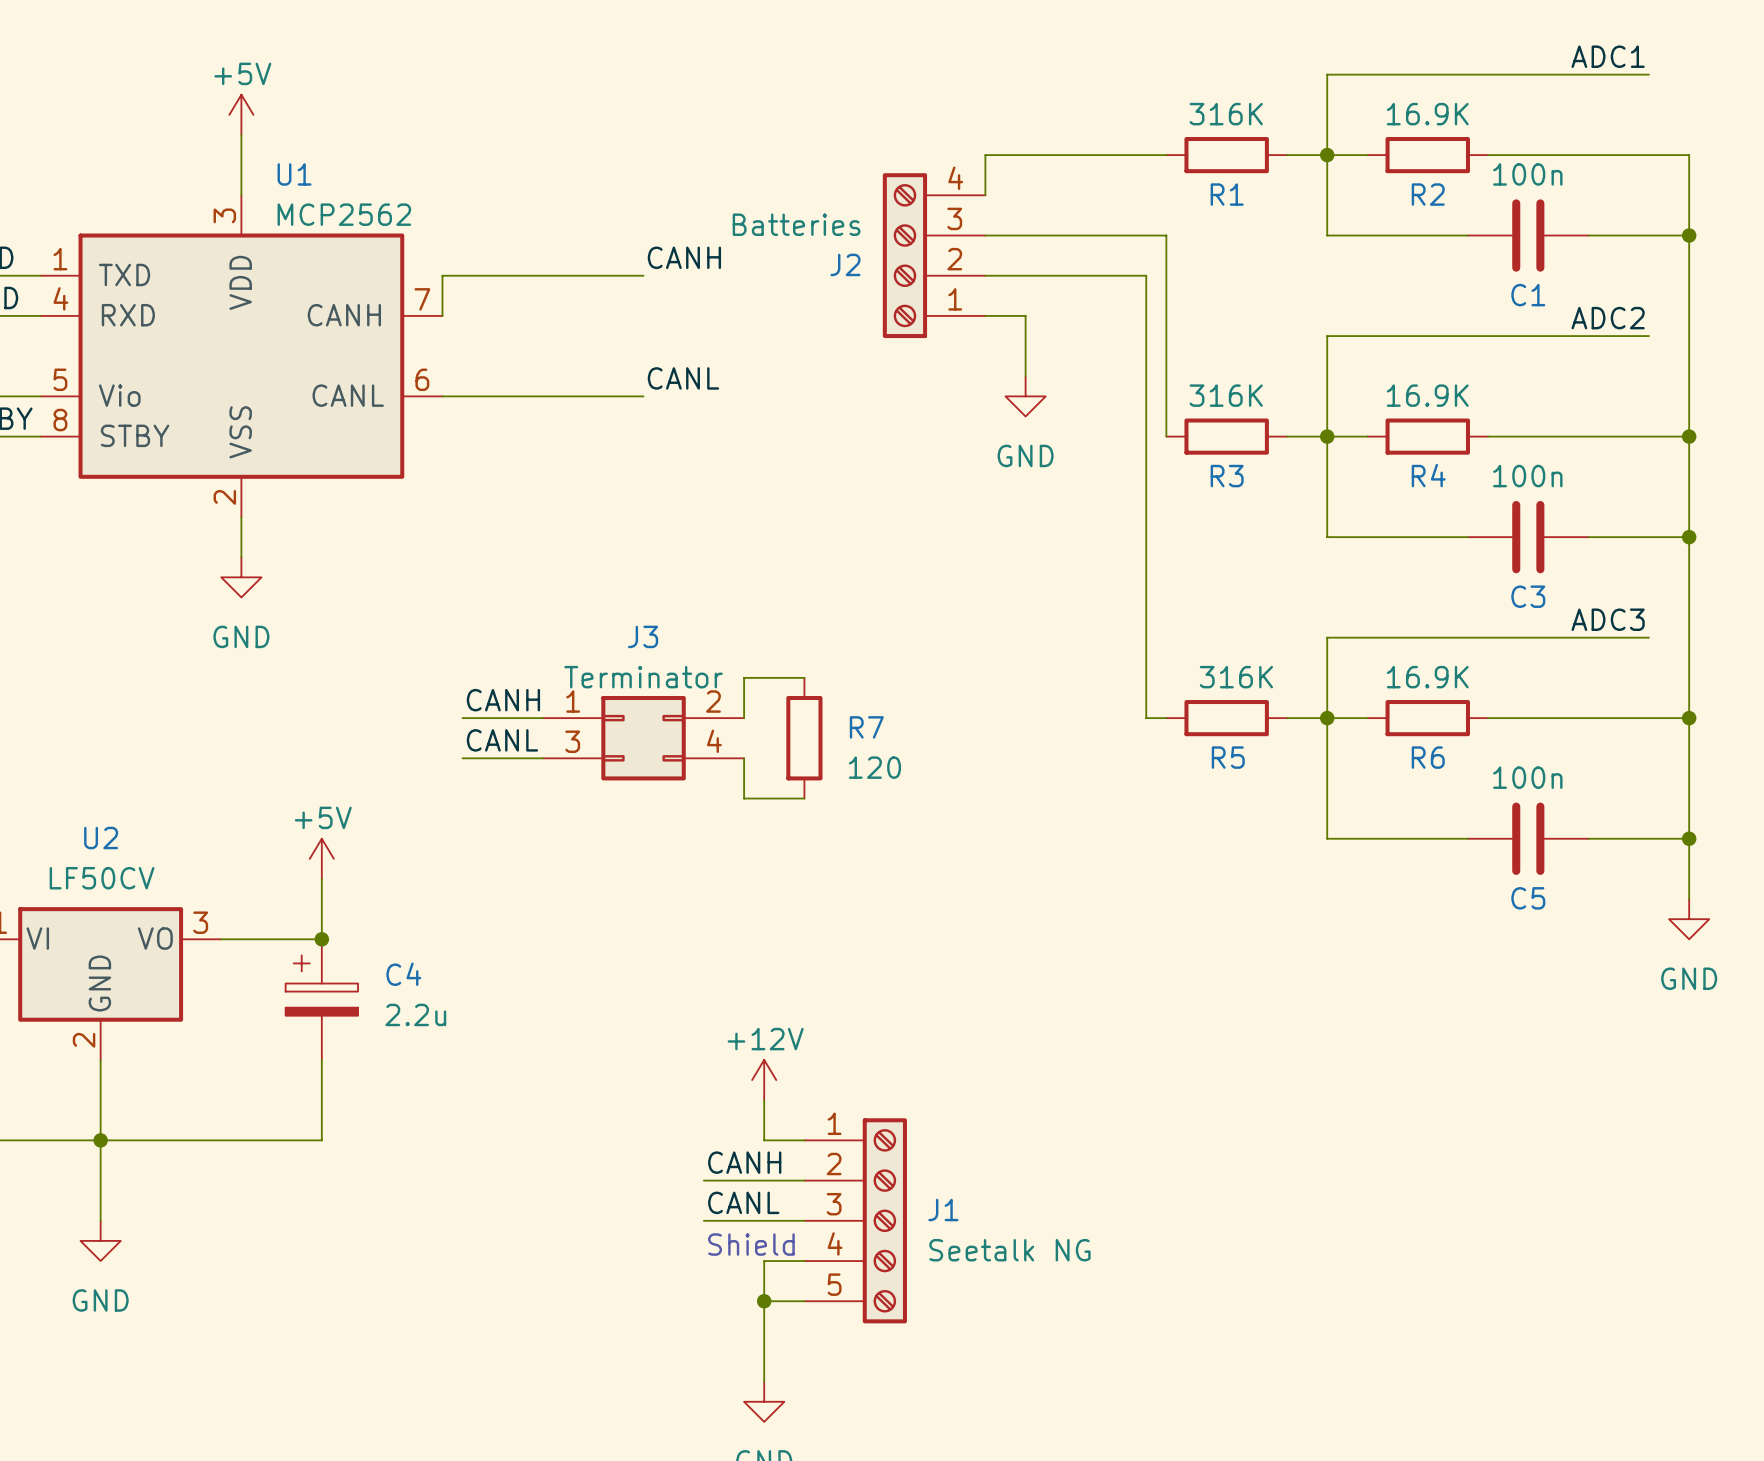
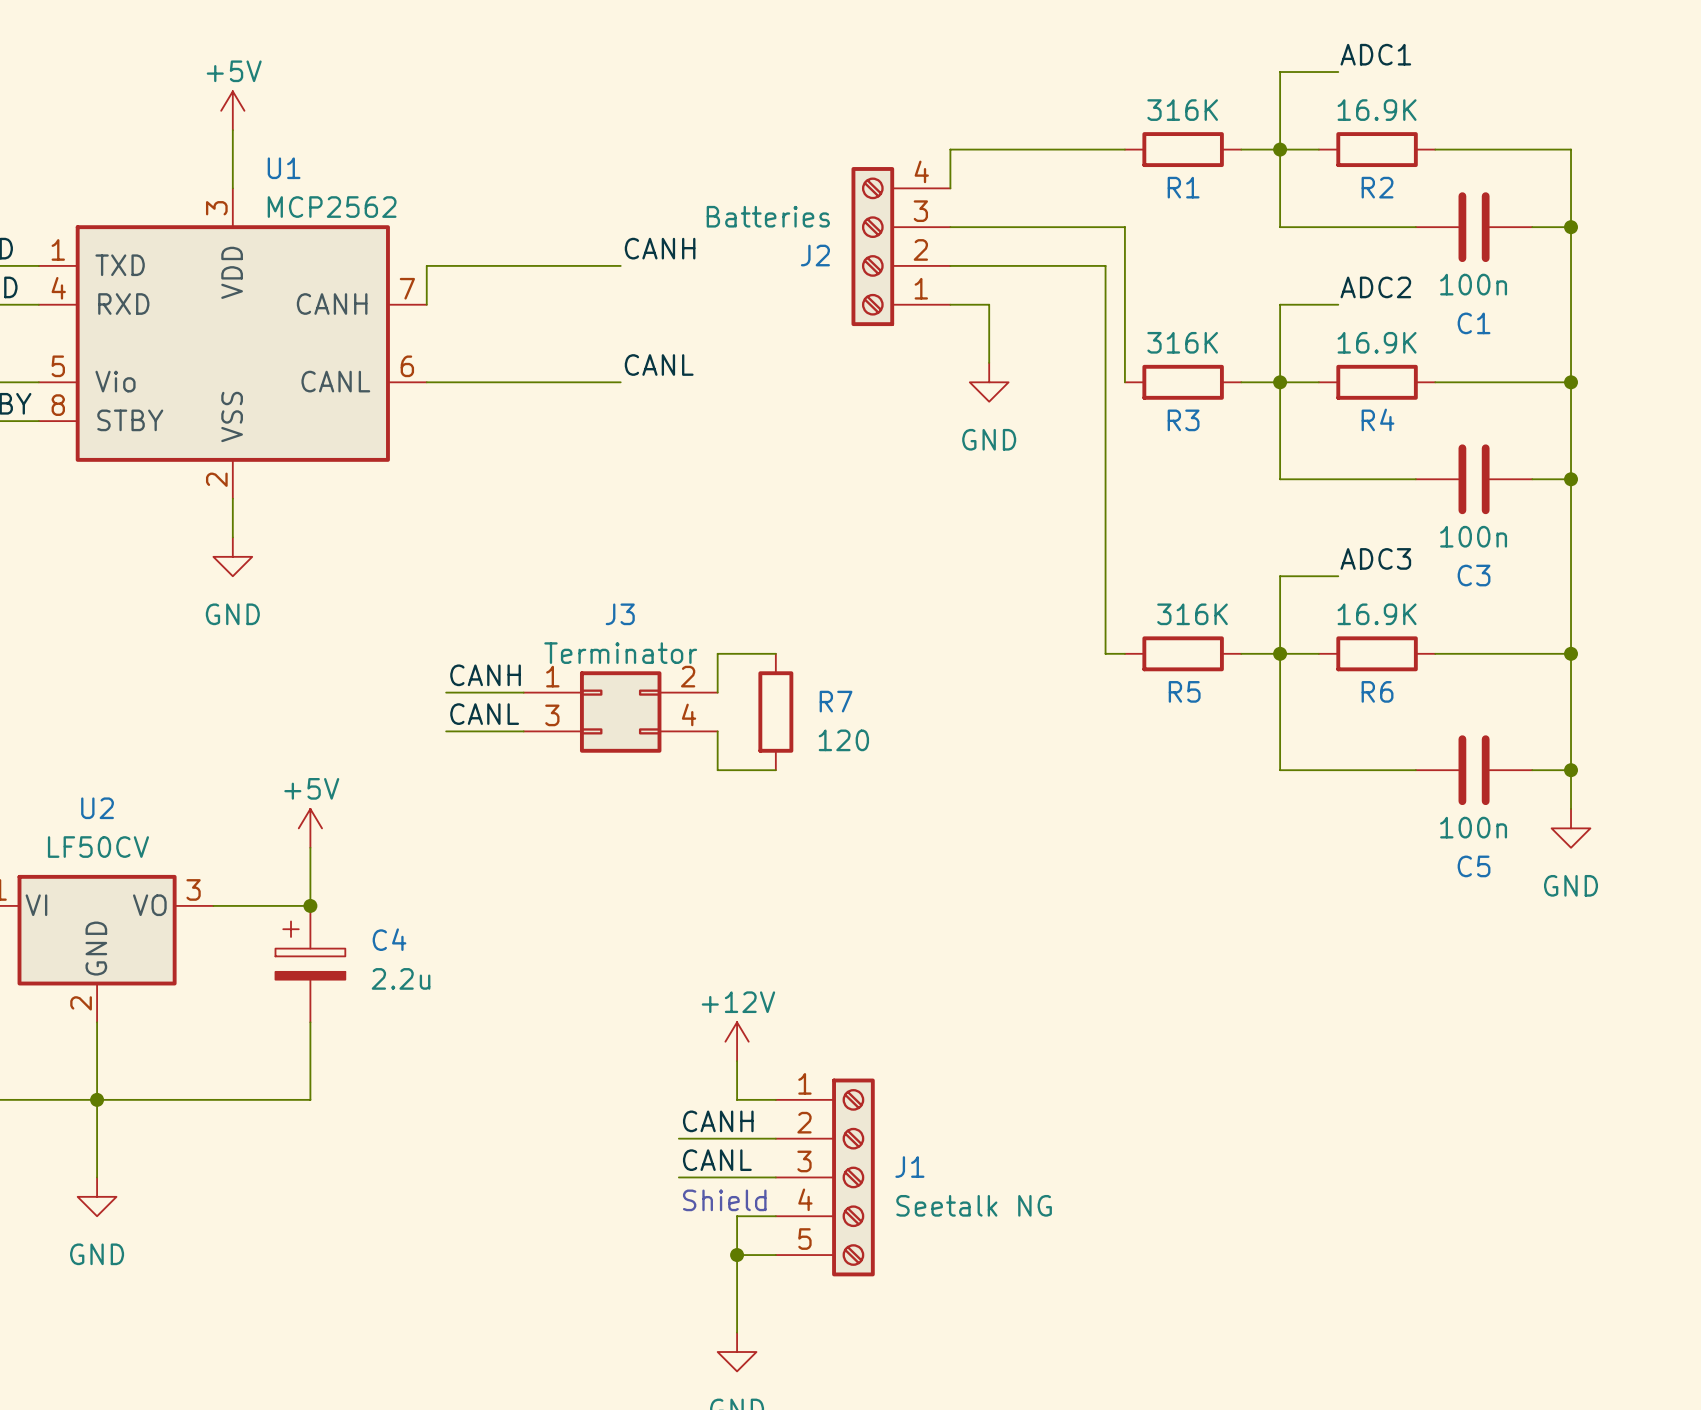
label position: ADC1 (1608, 56) -> ADC1 (1375, 54)
wire: (1387, 74) (1648, 74) -> none
wire: (1628, 155) (1689, 155) (1689, 899) -> (1571, 149) (1571, 808)
C1 value position: 100n (1527, 174) -> 100n (1473, 284)
wire: (1628, 235) (1689, 235) -> none
junction position: (1689, 235) -> (1571, 227)
C1 name position: C1 (1528, 295) -> C1 (1474, 323)
label position: ADC2 (1608, 318) -> ADC2 (1375, 287)
wire: (1327, 336) (1648, 336) -> (1280, 324) (1280, 304) (1338, 304)
wire: (1166, 396) (1166, 436) -> none
wire: none -> (1435, 382) (1571, 382)
junction: none -> (1571, 382)
R3 position: (1226, 436) -> (1183, 382)
wire: (1287, 436) (1367, 436) -> (1241, 382) (1318, 382)
junction position: (1327, 436) -> (1280, 382)
R4 position: (1427, 436) -> (1377, 382)
wire: (1488, 436) (1689, 436) -> none
junction: (1689, 436) -> none
C3 value position: 100n (1527, 476) -> 100n (1473, 536)
wire: (1327, 496) (1327, 537) (1467, 537) -> (1280, 479) (1415, 479)
wire: none -> (1532, 479) (1571, 479)
junction: none -> (1571, 479)
C3 position: (1528, 537) -> (1474, 479)
wire: (1588, 537) (1689, 537) -> none
junction: (1689, 537) -> none
label position: ADC3 (1608, 619) -> ADC3 (1375, 558)
wire: (1327, 637) (1648, 637) -> (1280, 615) (1280, 576) (1338, 576)
wire: (1146, 677) (1146, 718) (1166, 718) -> (1105, 653) (1124, 653)
wire: none -> (1435, 653) (1571, 653)
junction: none -> (1571, 653)
R5 position: (1226, 718) -> (1183, 653)
wire: (1287, 718) (1367, 718) -> (1241, 653) (1318, 653)
junction position: (1327, 718) -> (1280, 653)
R6 position: (1427, 718) -> (1377, 653)
wire: (1488, 718) (1689, 718) -> none
junction: (1689, 718) -> none
C5 value position: 100n (1527, 777) -> 100n (1473, 827)
wire: (1327, 798) (1327, 838) (1467, 838) -> (1280, 770) (1415, 770)
wire: none -> (1532, 770) (1571, 770)
junction: none -> (1571, 770)
C5 position: (1528, 838) -> (1474, 770)
wire: (1588, 838) (1689, 838) -> none
junction: (1689, 838) -> none
power symbol position: GND (1689, 919) -> GND (1571, 828)

